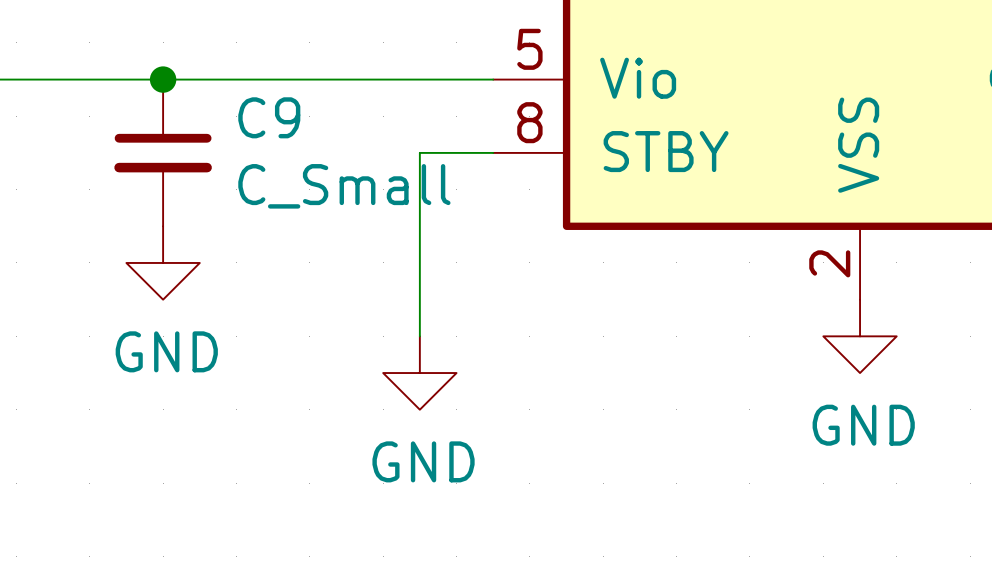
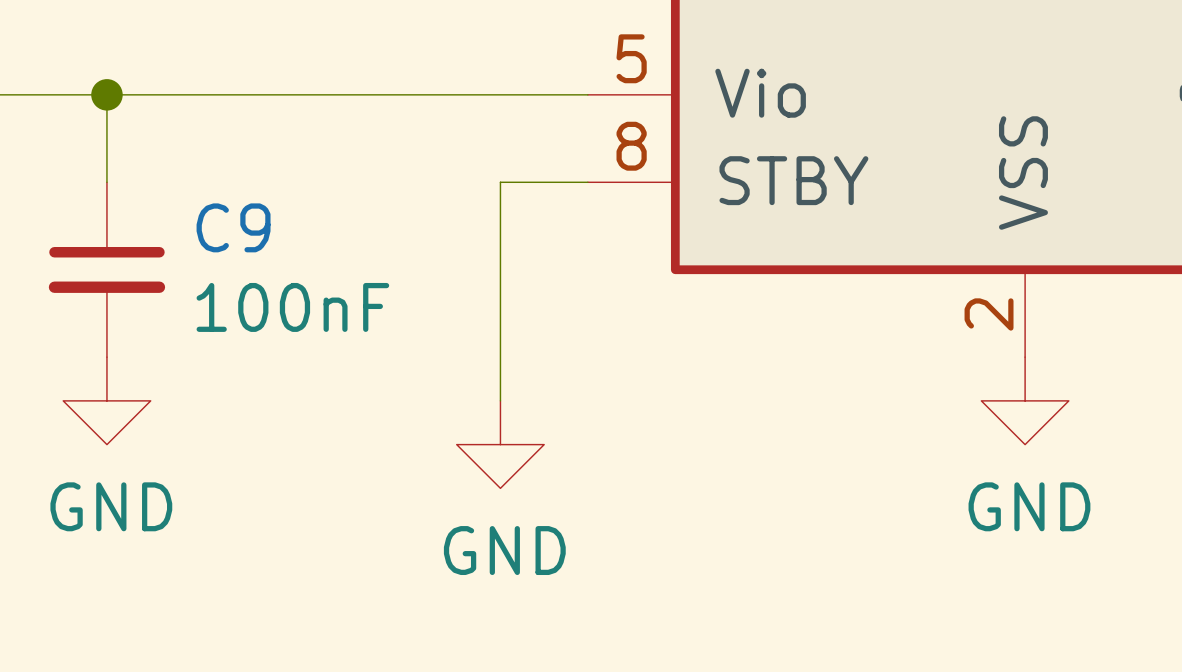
wire: none -> (106, 94) (106, 182)
junction position: (163, 79) -> (106, 94)
C9 position: (163, 152) -> (106, 269)
C9 value: C_Small (344, 186) -> 100nF (292, 307)
power symbol position: GND (163, 262) -> GND (106, 400)

